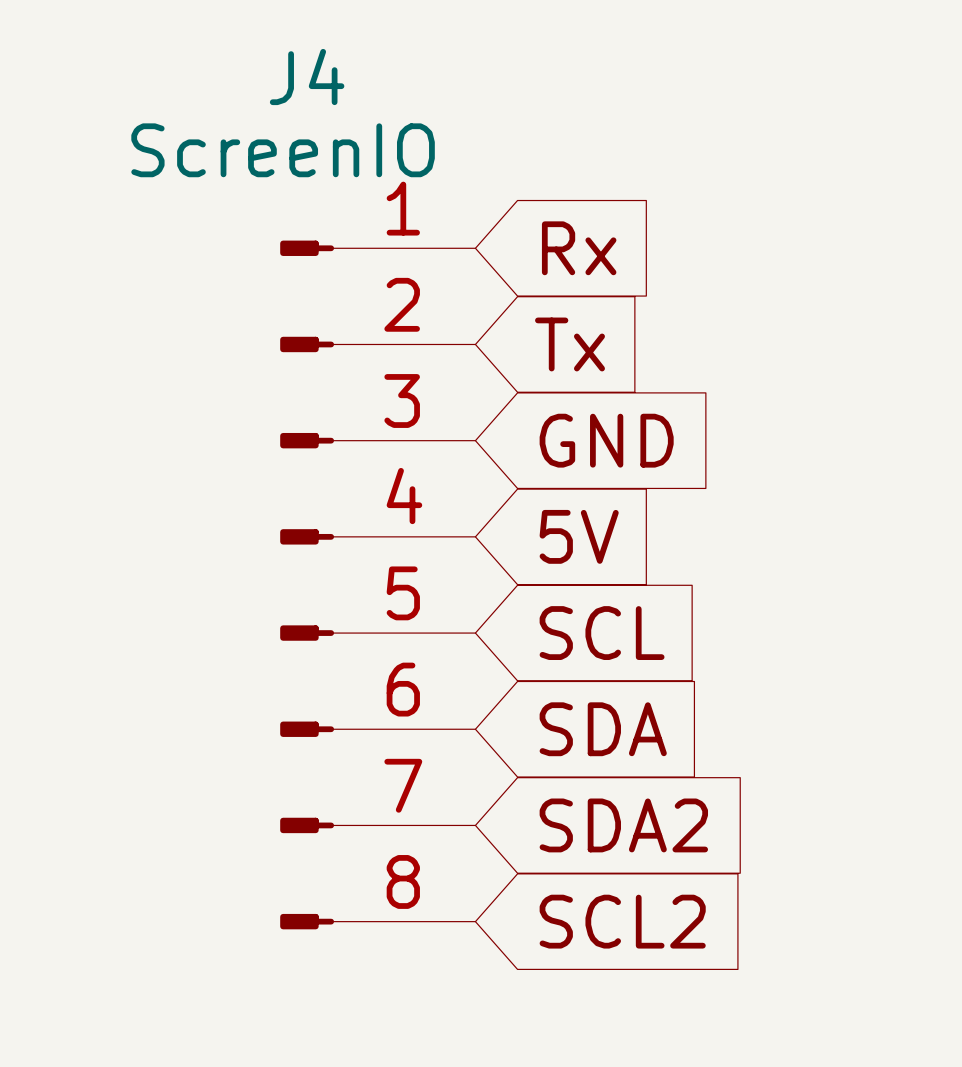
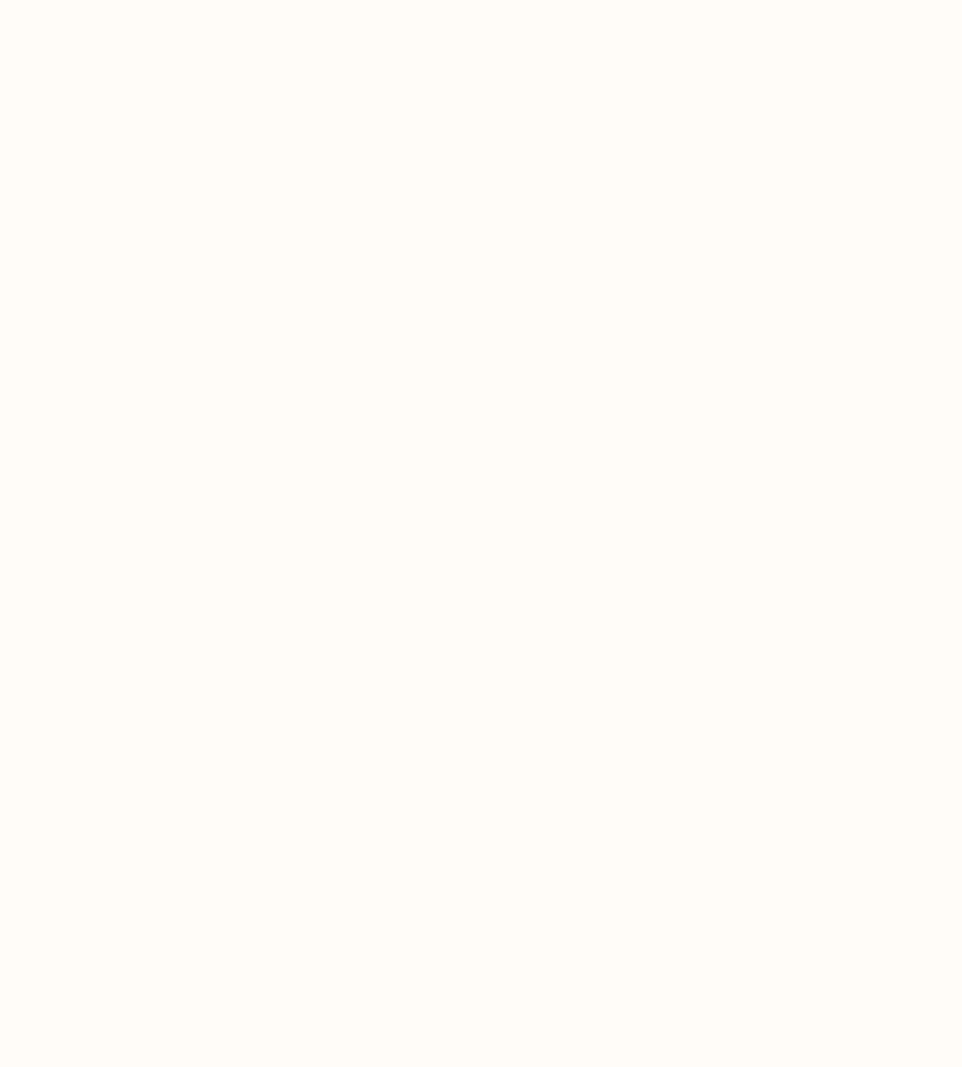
global label: Rx (579, 248) -> none
global label: Tx (570, 344) -> none
global label: GND (606, 440) -> none
global label: 5V (579, 536) -> none
J4: ScreenIO (377, 584) -> none
global label: SCL (602, 633) -> none
global label: SDA (603, 729) -> none
global label: SDA2 (623, 825) -> none
global label: SCL2 (622, 921) -> none

